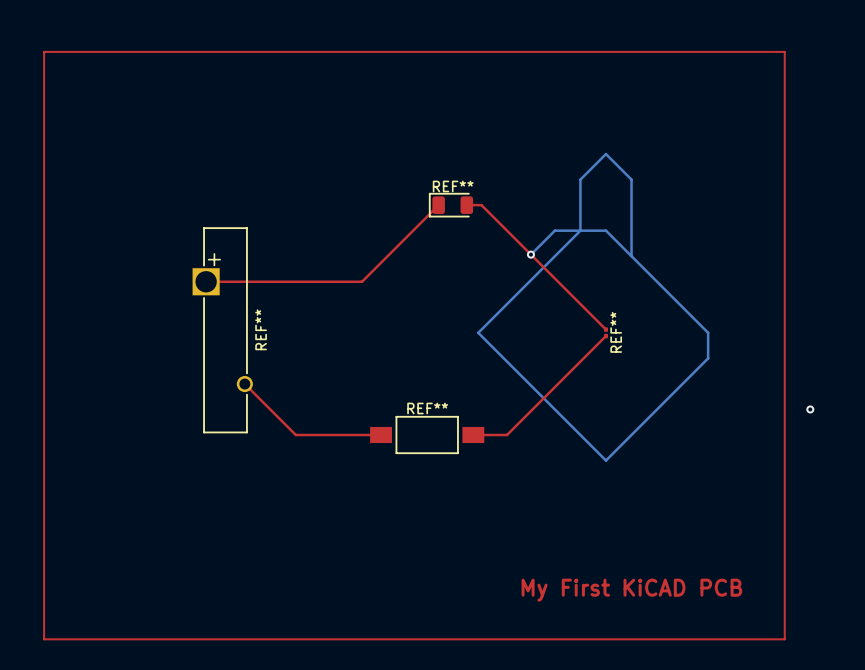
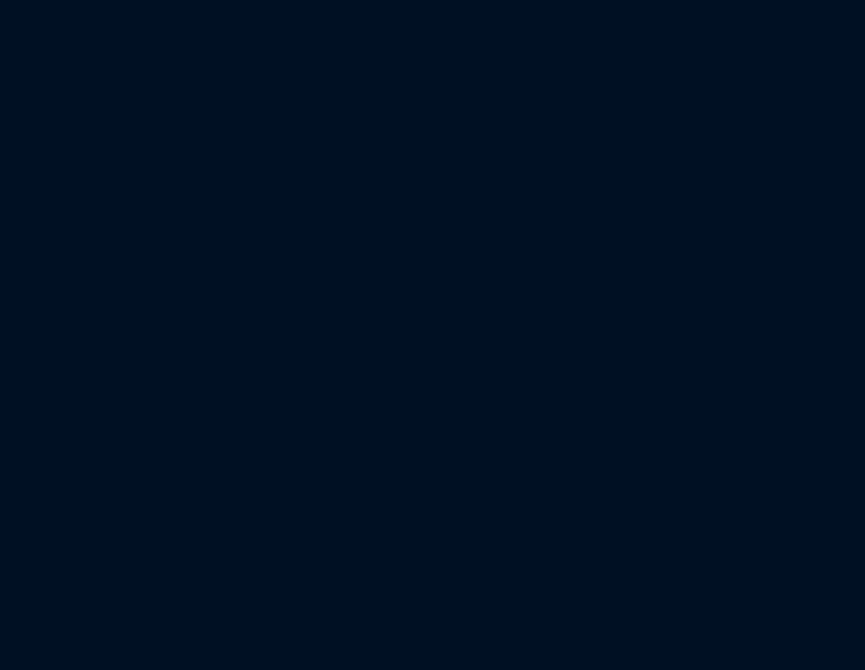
top track: (44, 51) (784, 51) (784, 639) (44, 639) (44, 51) -> none
top track: (438, 205) (362, 281) (206, 281) -> none
REF**: (451, 205) -> none
top track: (466, 205) (481, 205) (605, 329) -> none
bottom track: (530, 254) (554, 230) (605, 230) (708, 332) (708, 358) (605, 460) (478, 332) (580, 230) (580, 179) (605, 154) (631, 179) (631, 256) -> none
via: (530, 254) -> none
REF**: (222, 330) -> none
REF**: (605, 332) -> none
top track: (605, 336) (507, 435) (473, 435) -> none
top track: (244, 384) (295, 435) (381, 435) -> none
via: (810, 409) -> none
REF**: (427, 435) -> none
text: My First KiCAD PCB (631, 590) -> none

